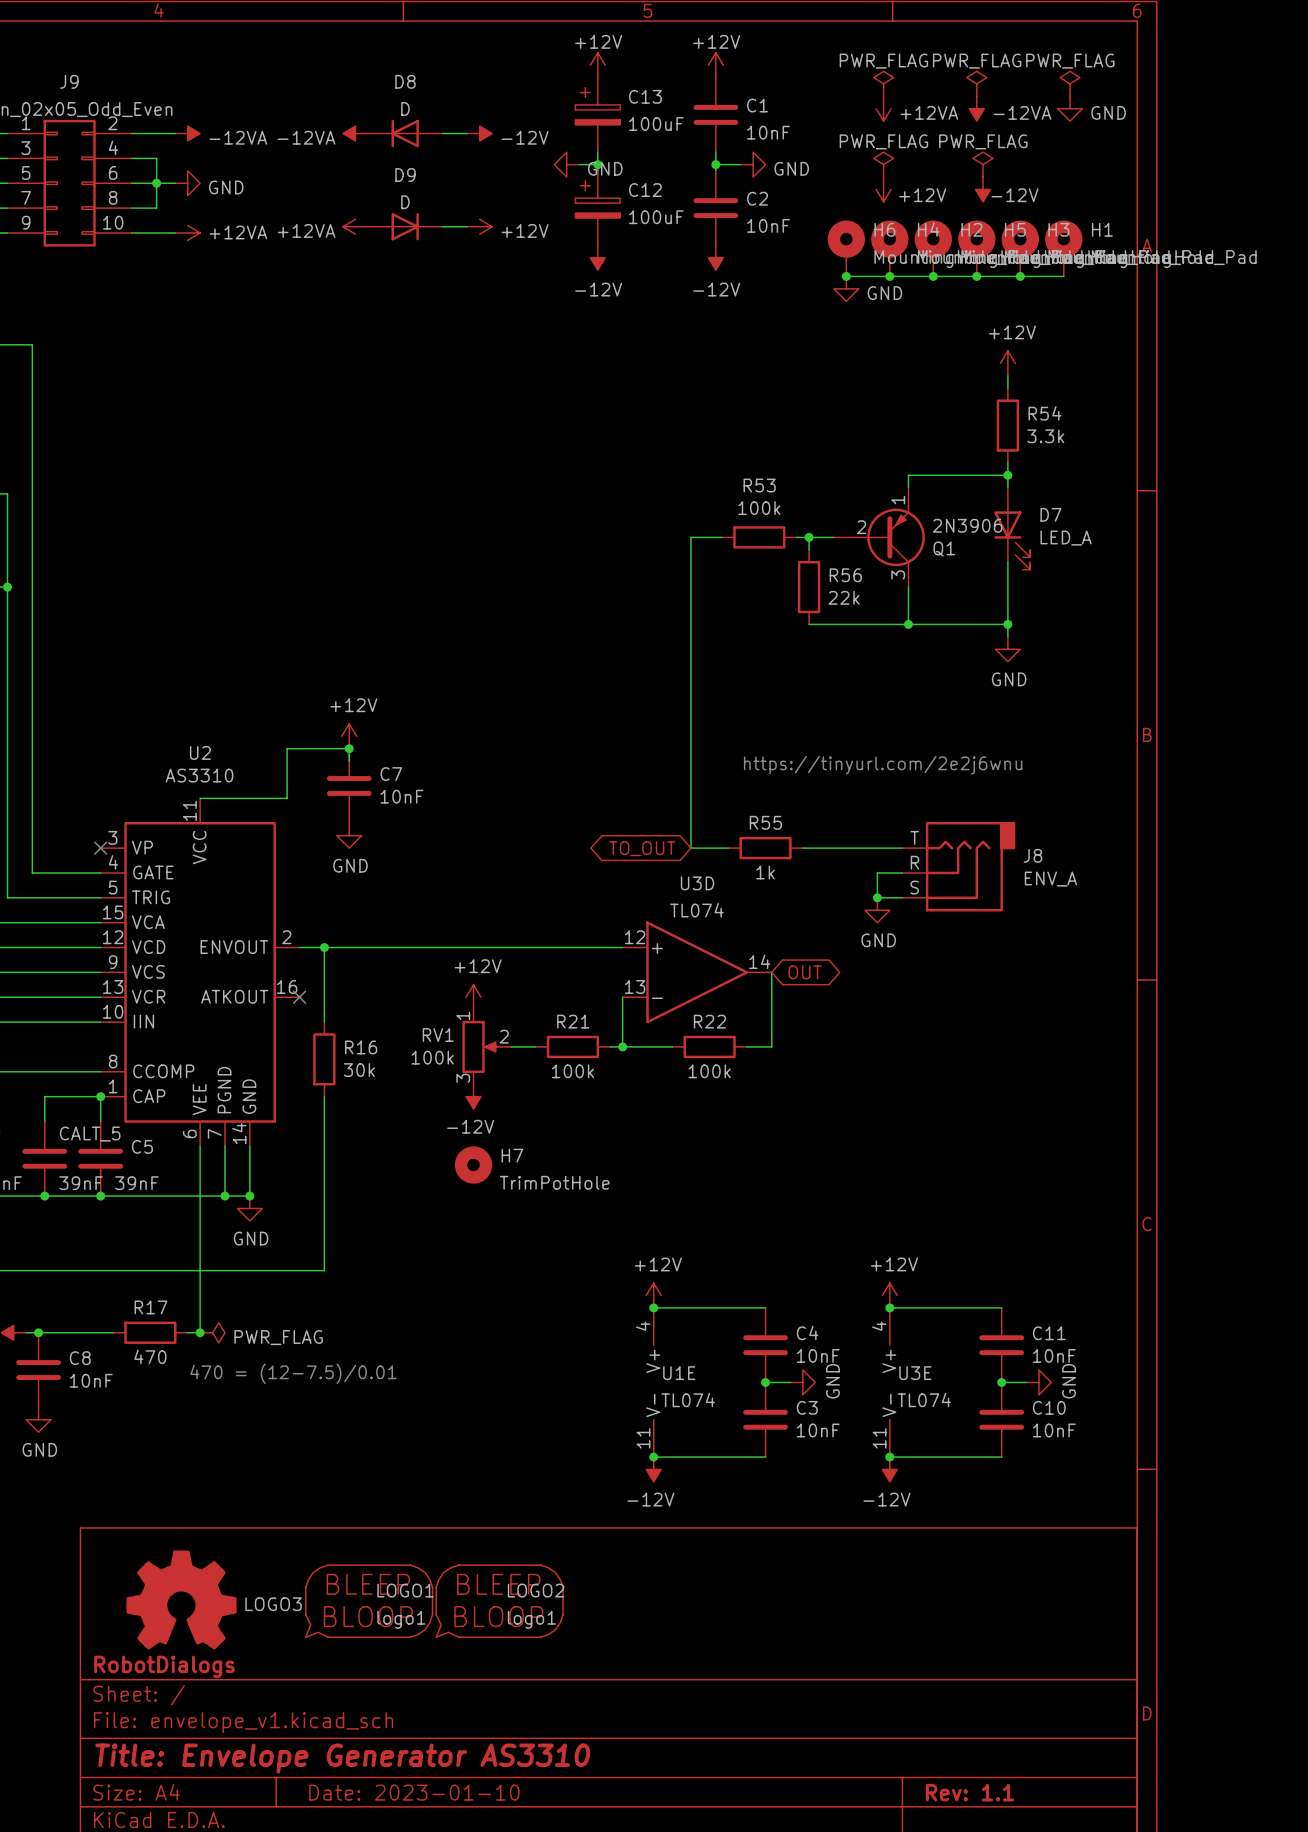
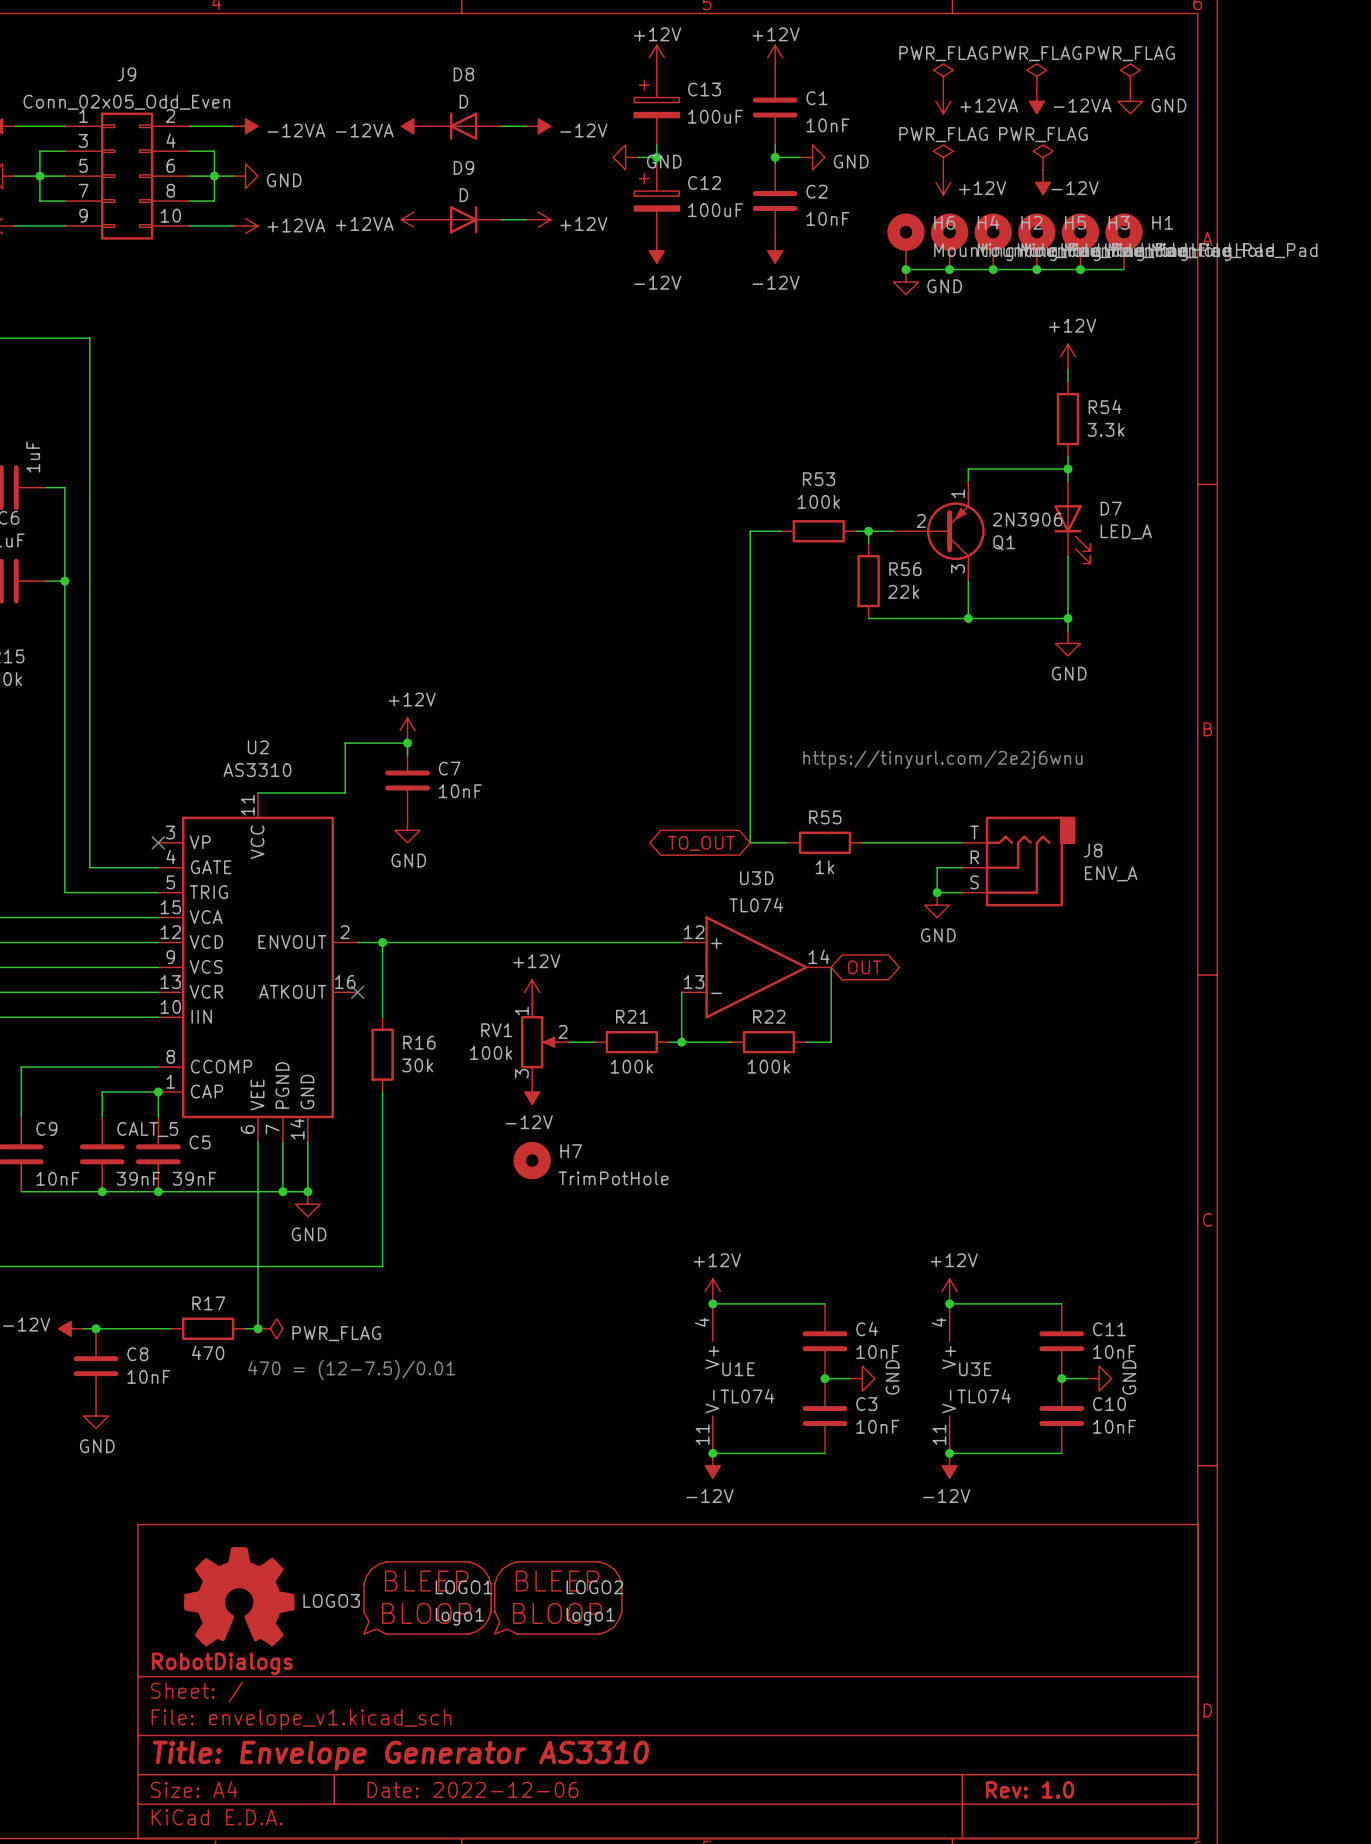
title block: Date: 2023-01-10 (414, 1792) -> Date: 2022-12-06 (472, 1789)
title block: Rev: 1.1 (970, 1792) -> Rev: 1.0 (1030, 1789)

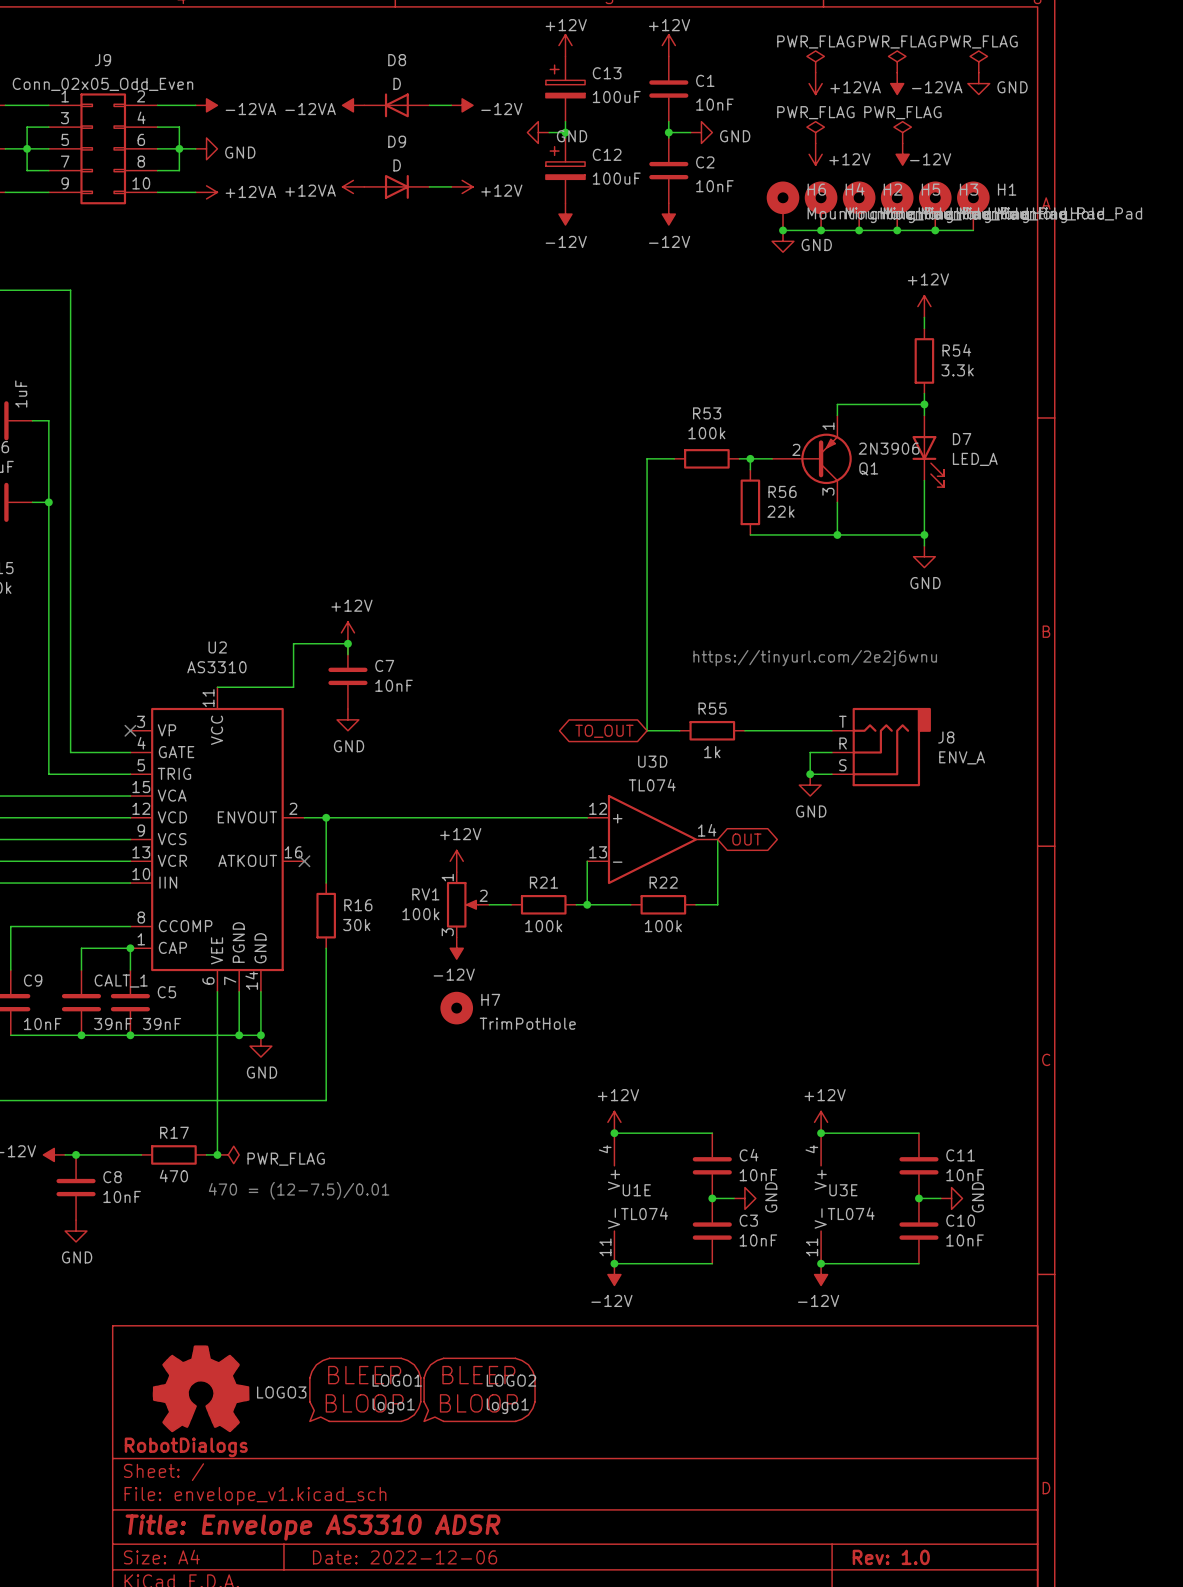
CALT_5 name: CALT_5 (147, 1129) -> CALT_1 (121, 981)
title block: Title: Envelope Generator AS3310 (400, 1755) -> Title: Envelope AS3310 ADSR (313, 1527)

